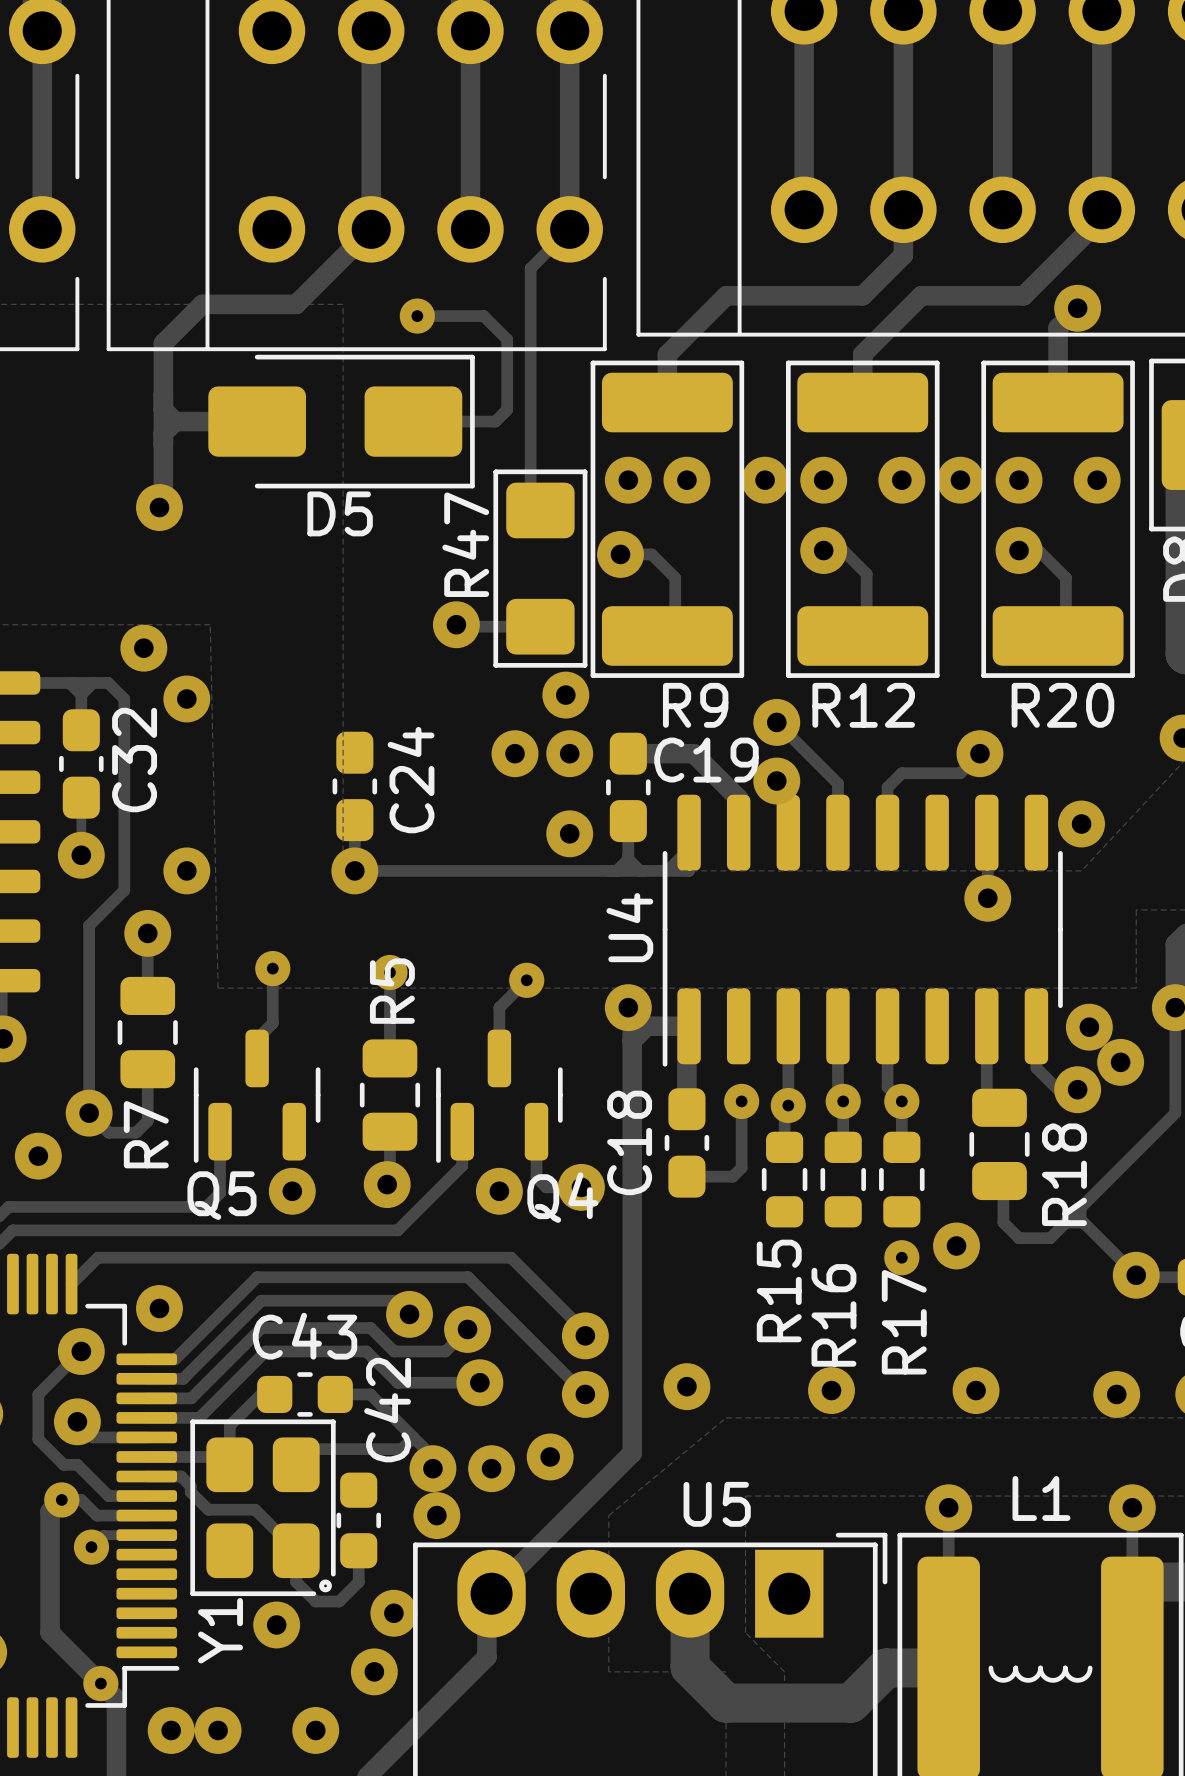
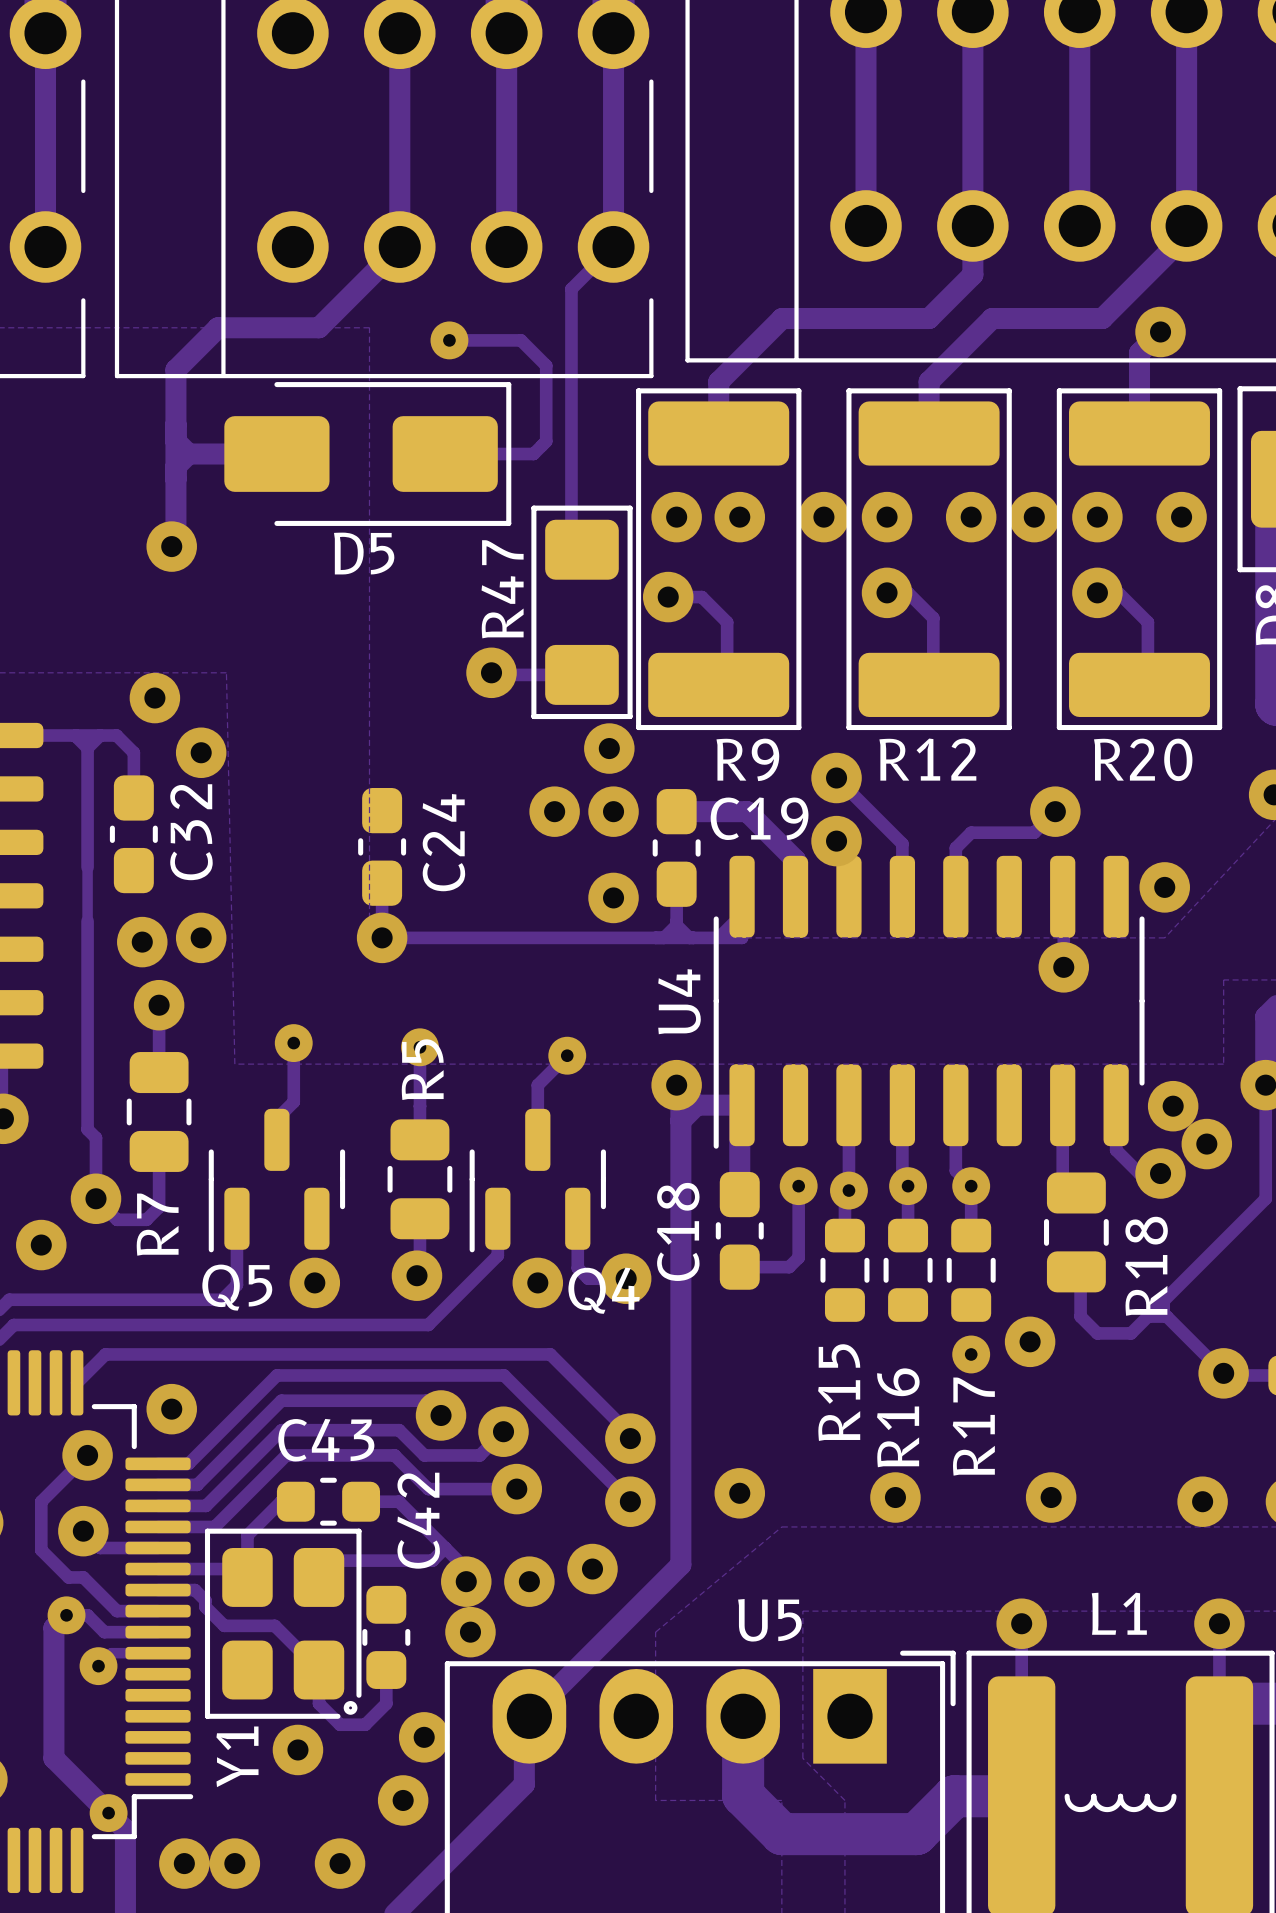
track: none -> (87, 786) (87, 867)
track: (124, 740) (124, 890) (89, 925) (89, 1056) -> (87, 921) (87, 1129) (95, 1137)
C32 position: (81, 763) -> (133, 834)
via position: (81, 855) -> (142, 942)

